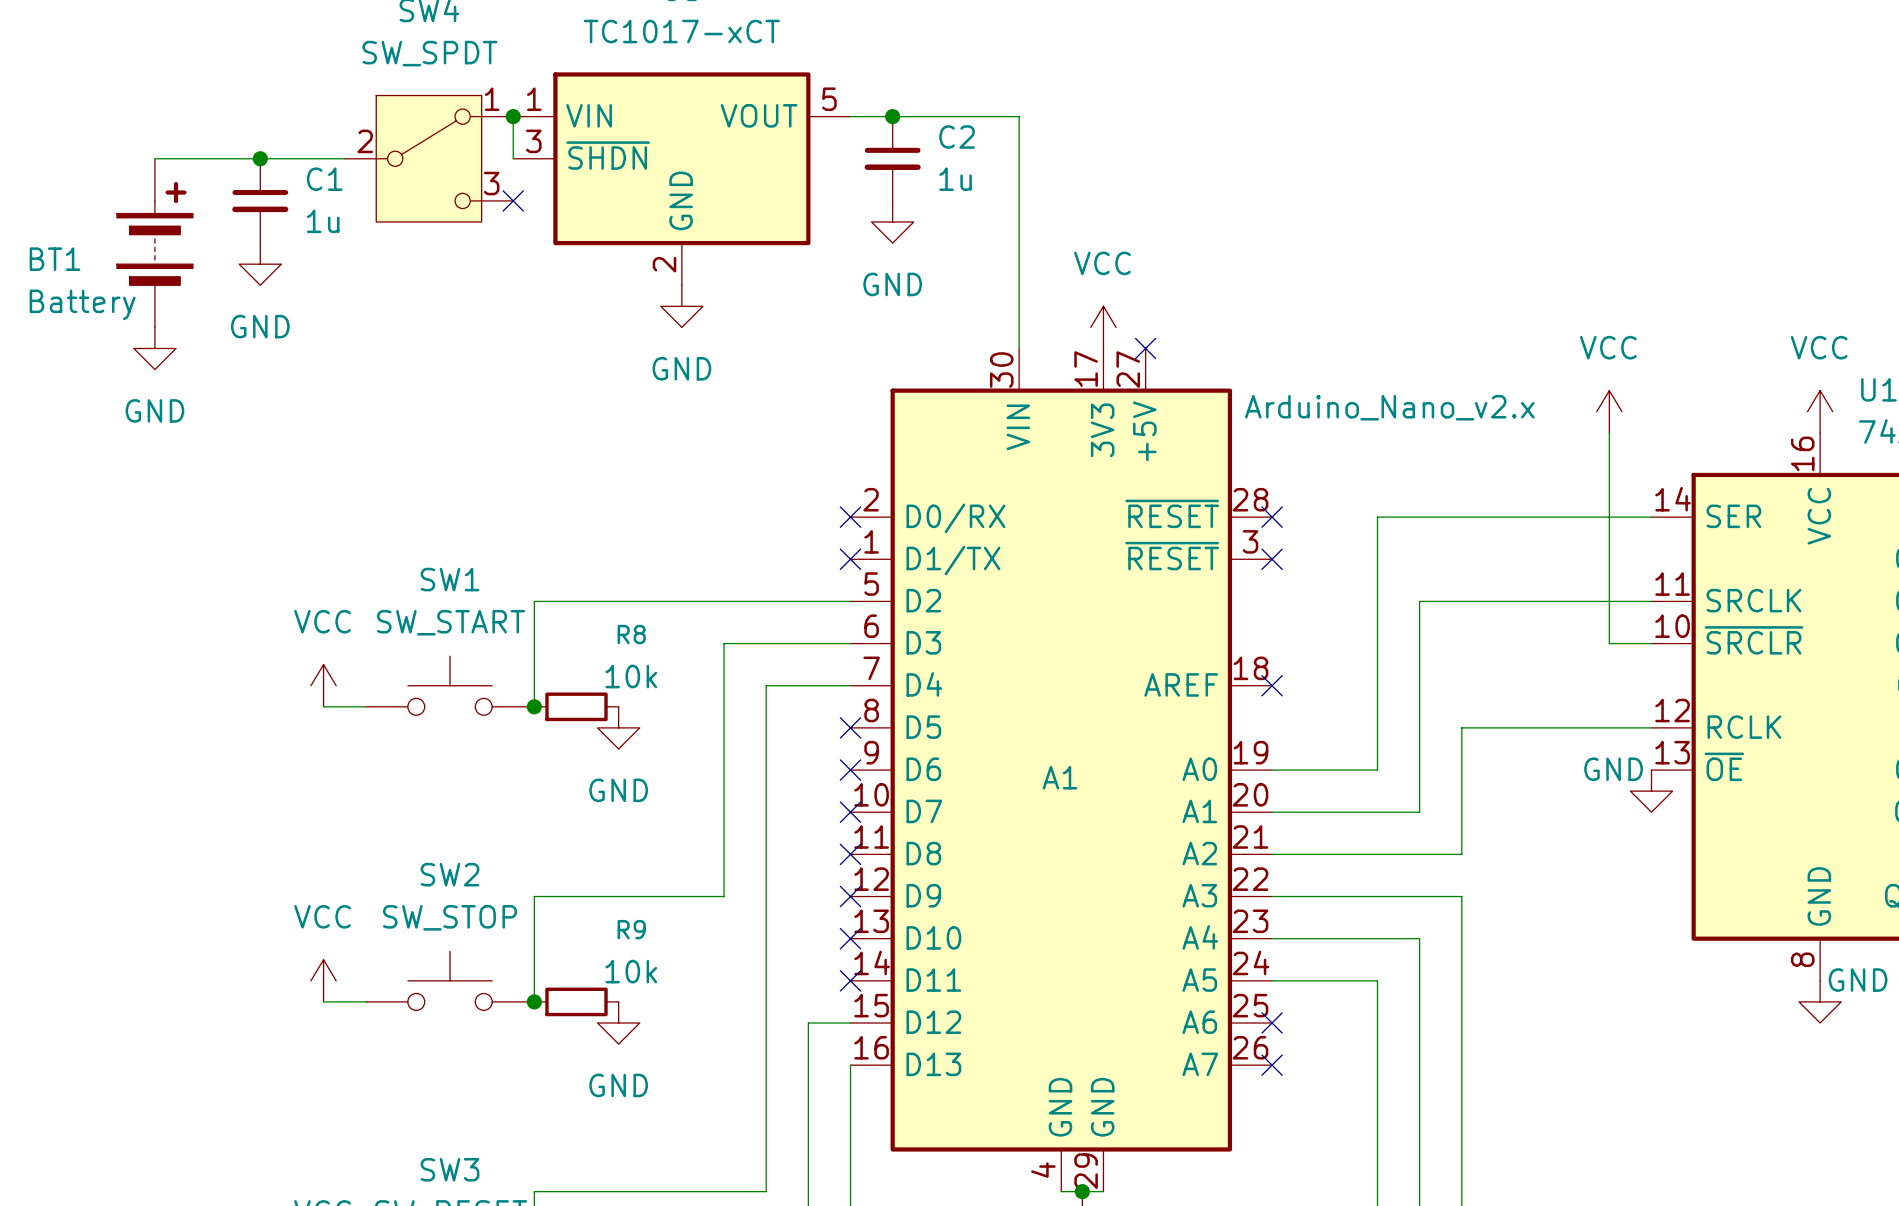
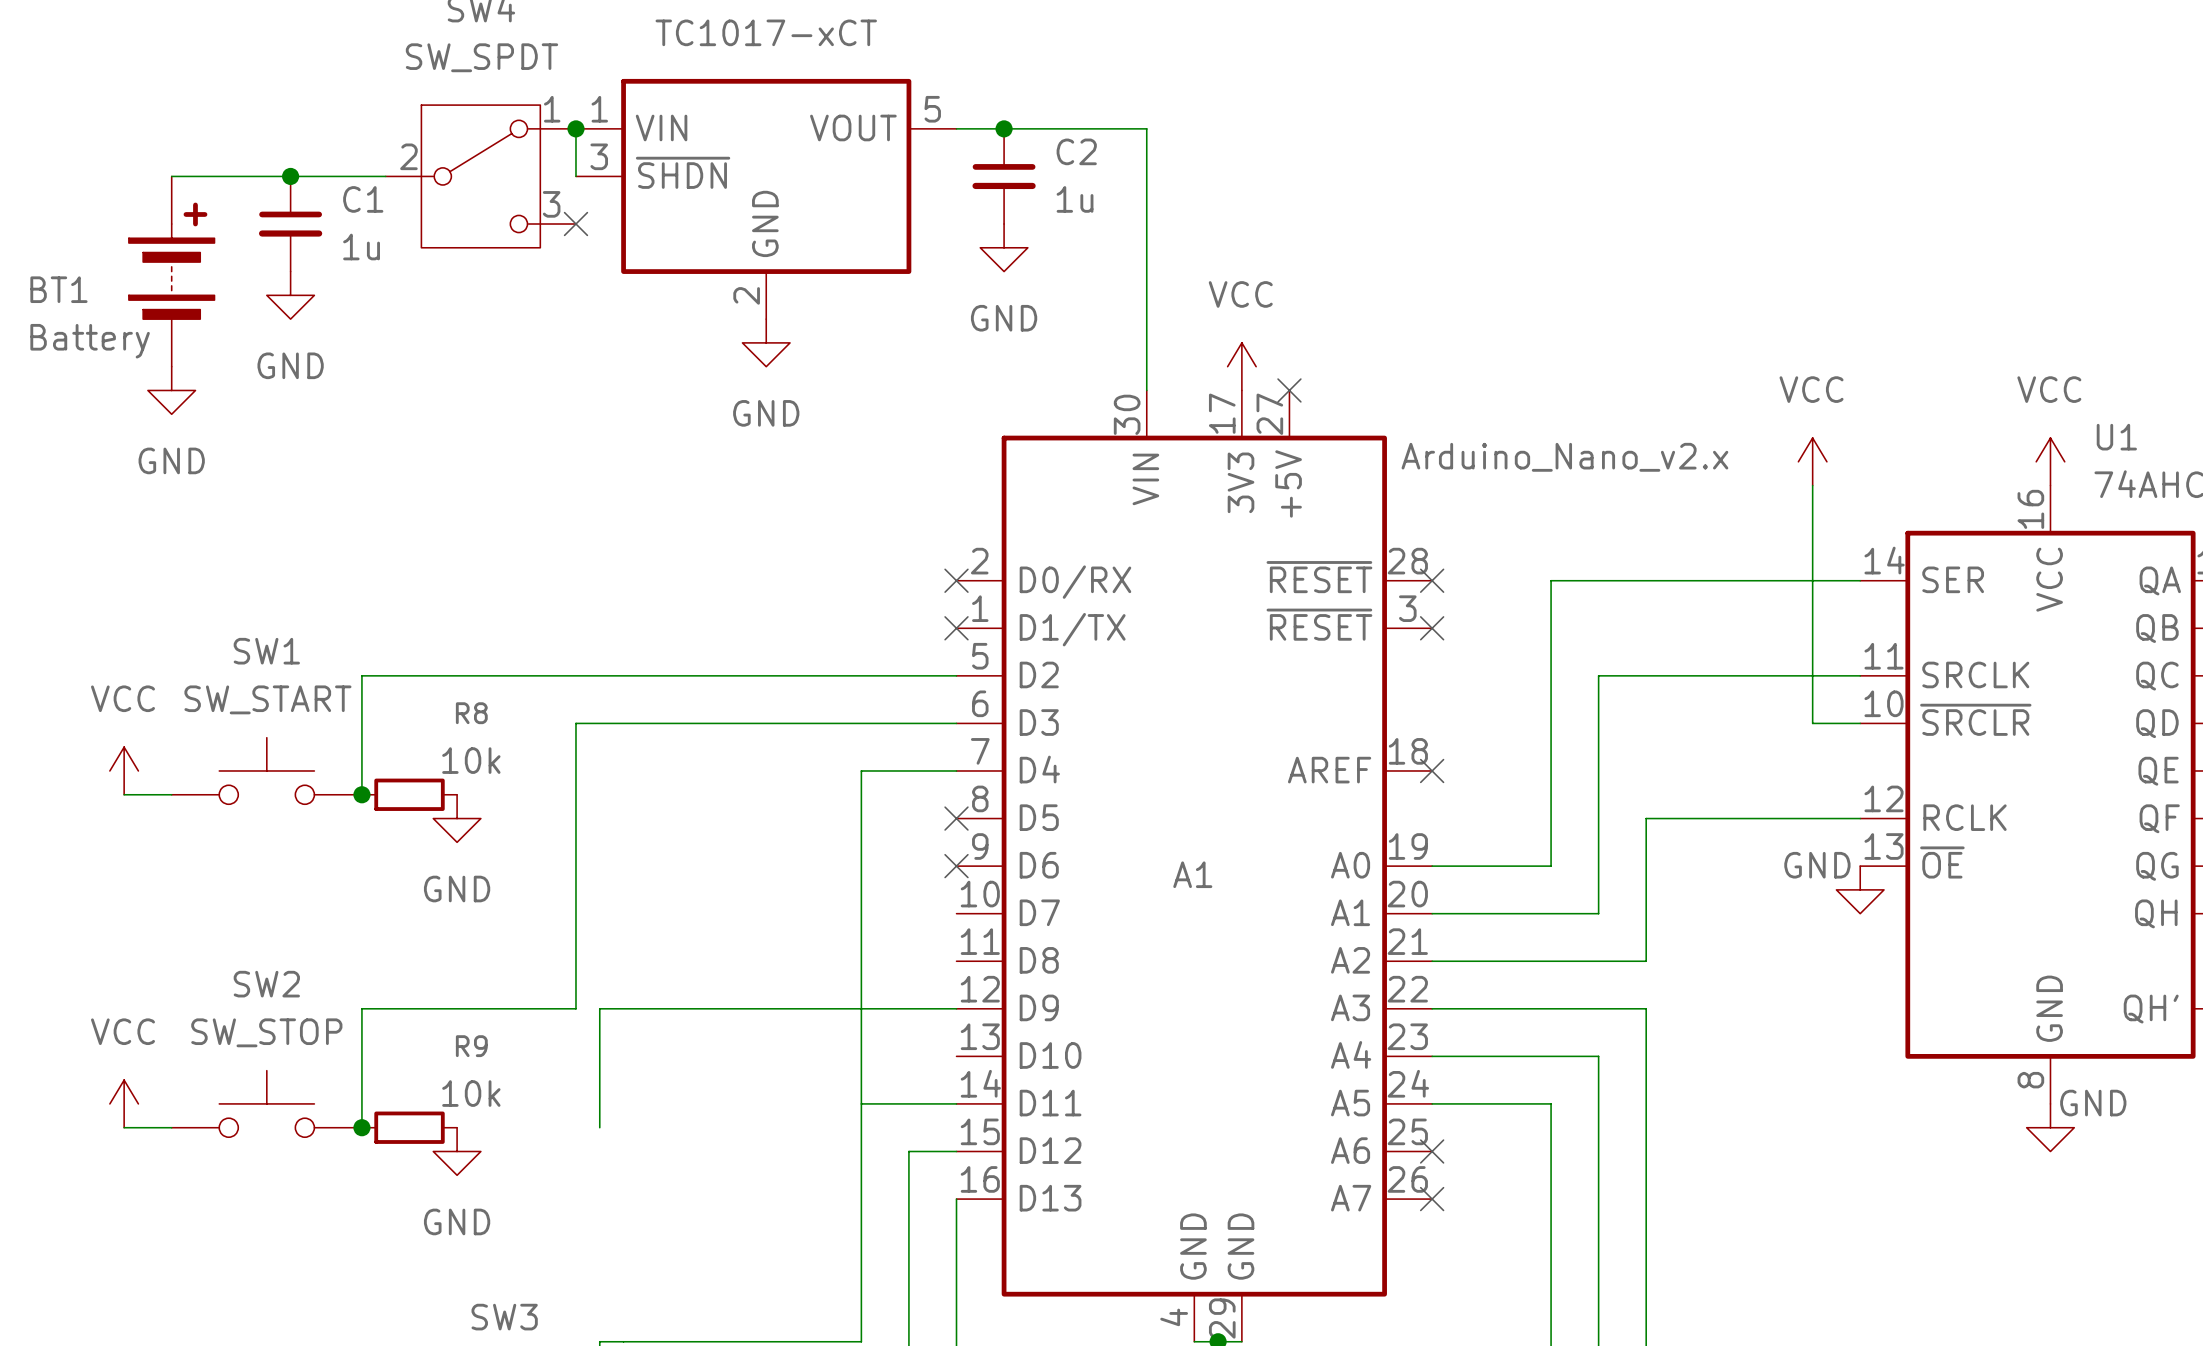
wire: (534, 601) (534, 706) -> none
wire: (724, 643) (724, 896) -> (956, 1008) (813, 1008)
power symbol: none -> VCC (124, 770)
power symbol: VCC (323, 685) -> none
SW1 position: (450, 685) -> (266, 770)
wire: none -> (124, 794) (171, 794)
wire: (323, 706) (365, 706) -> (361, 794) (361, 675) (599, 675)
junction: none -> (361, 794)
junction: (534, 706) -> none
R8 position: (576, 706) -> (409, 794)
power symbol: none -> GND (457, 818)
power symbol: GND (618, 727) -> none
no-connect mark: (850, 812) -> none
no-connect mark: (850, 854) -> none
no-connect mark: (850, 896) -> none
no-connect mark: (850, 938) -> none
power symbol: none -> VCC (124, 1103)
power symbol: VCC (323, 980) -> none
SW2 position: (450, 980) -> (266, 1103)
wire: none -> (861, 1103) (956, 1103)
no-connect mark: (850, 980) -> none
wire: none -> (124, 1127) (171, 1127)
wire: (323, 1001) (365, 1001) -> (361, 1127) (361, 1008) (575, 1008) (575, 723) (813, 723)
junction: none -> (361, 1127)
junction: (534, 1001) -> none
R9 position: (576, 1001) -> (409, 1127)
power symbol: none -> GND (457, 1151)
power symbol: GND (618, 1023) -> none

